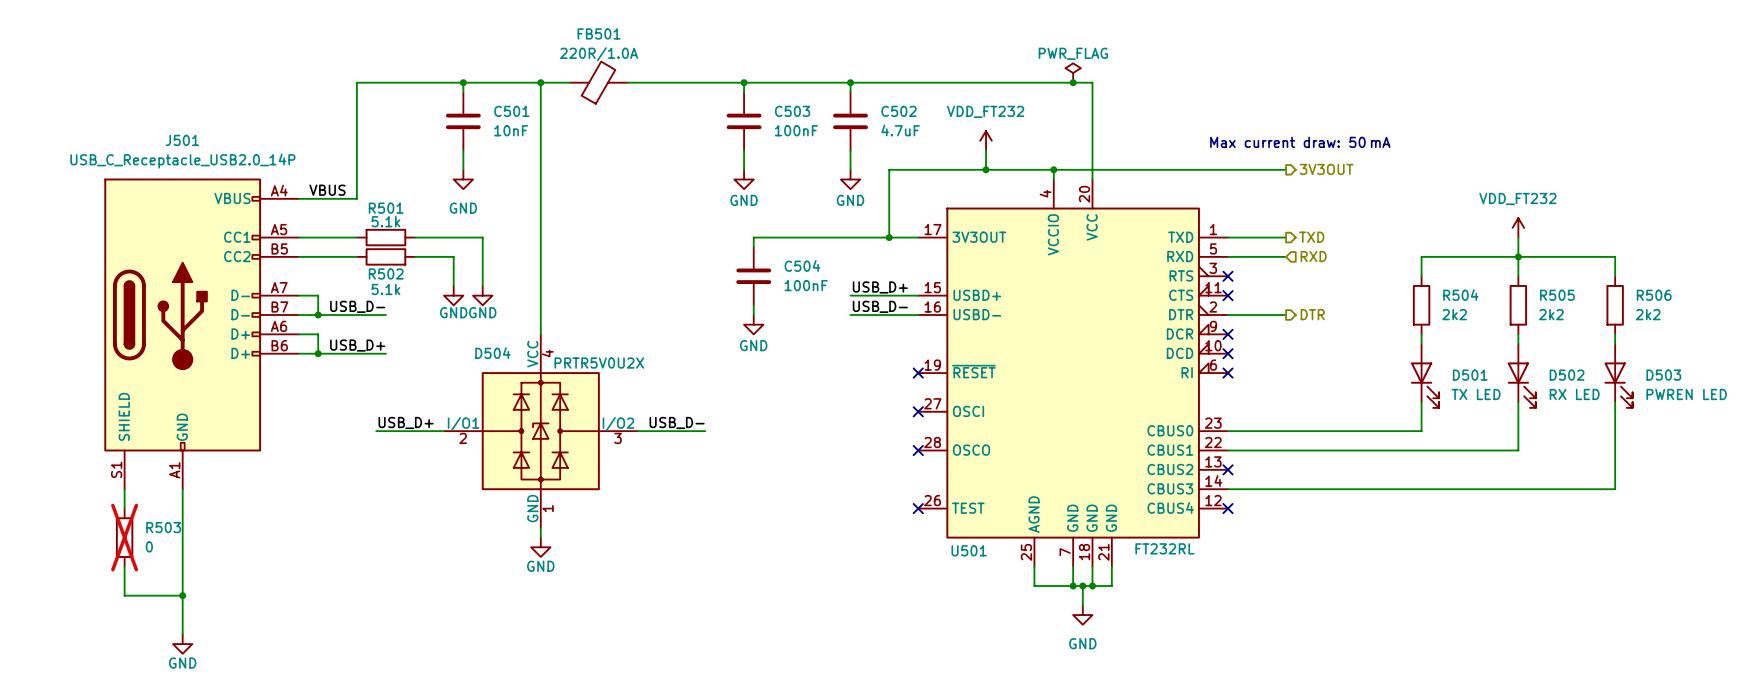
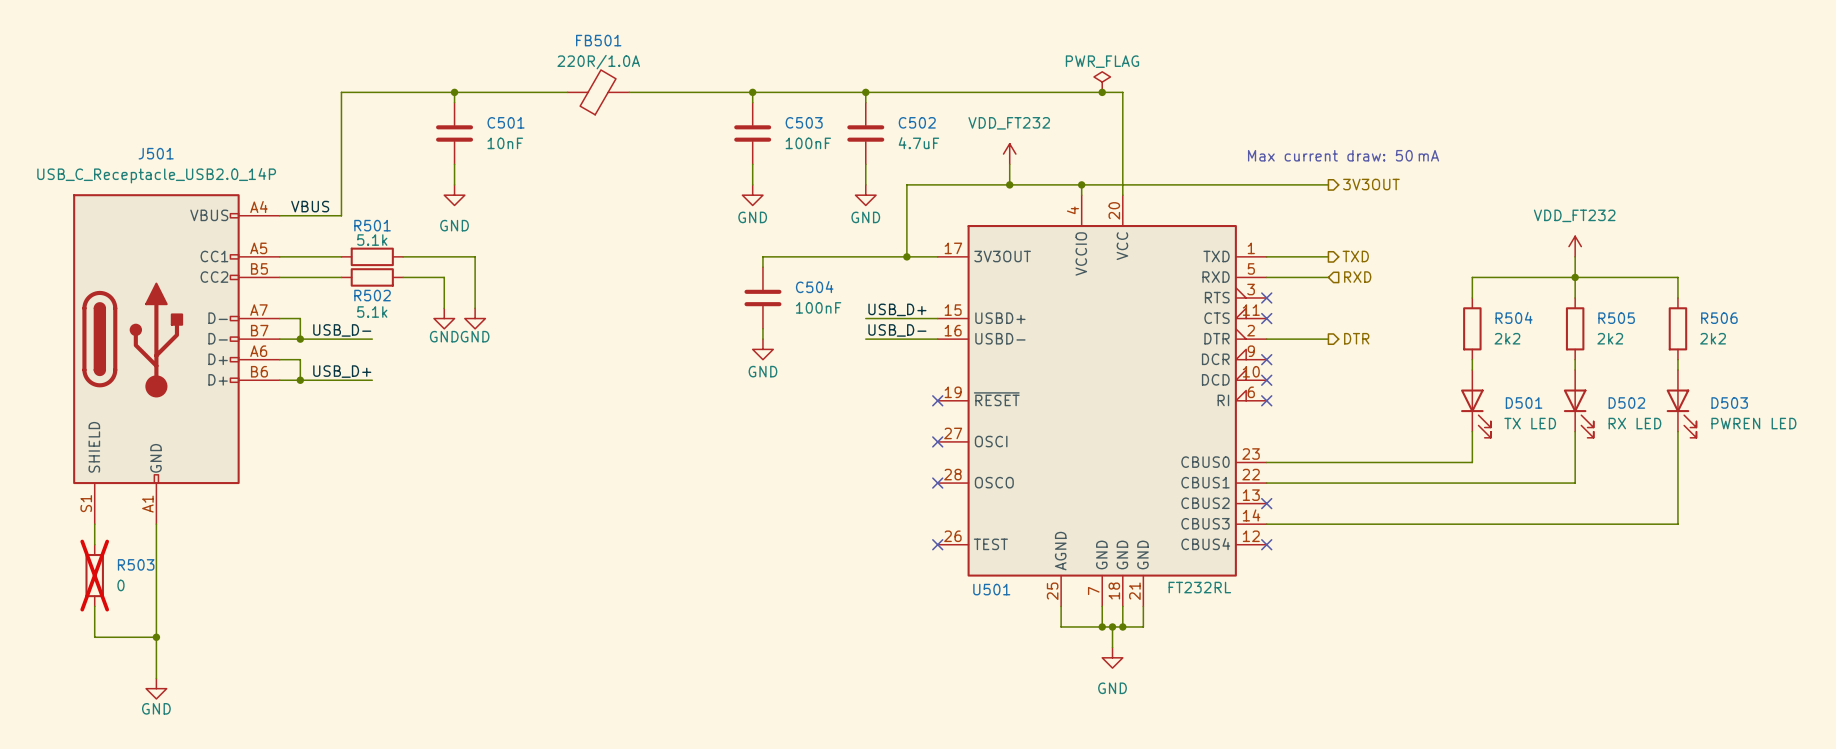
wire: (540, 82) (540, 334) -> none
junction: (540, 82) -> none
label: USB_D+ (406, 422) -> none
label: USB_D- (677, 422) -> none
wire: (376, 431) (444, 431) -> none
D504: PRTR5V0U2X (540, 431) -> none
wire: (637, 431) (705, 431) -> none
wire: (540, 527) (540, 537) -> none
power symbol: GND (540, 547) -> none

